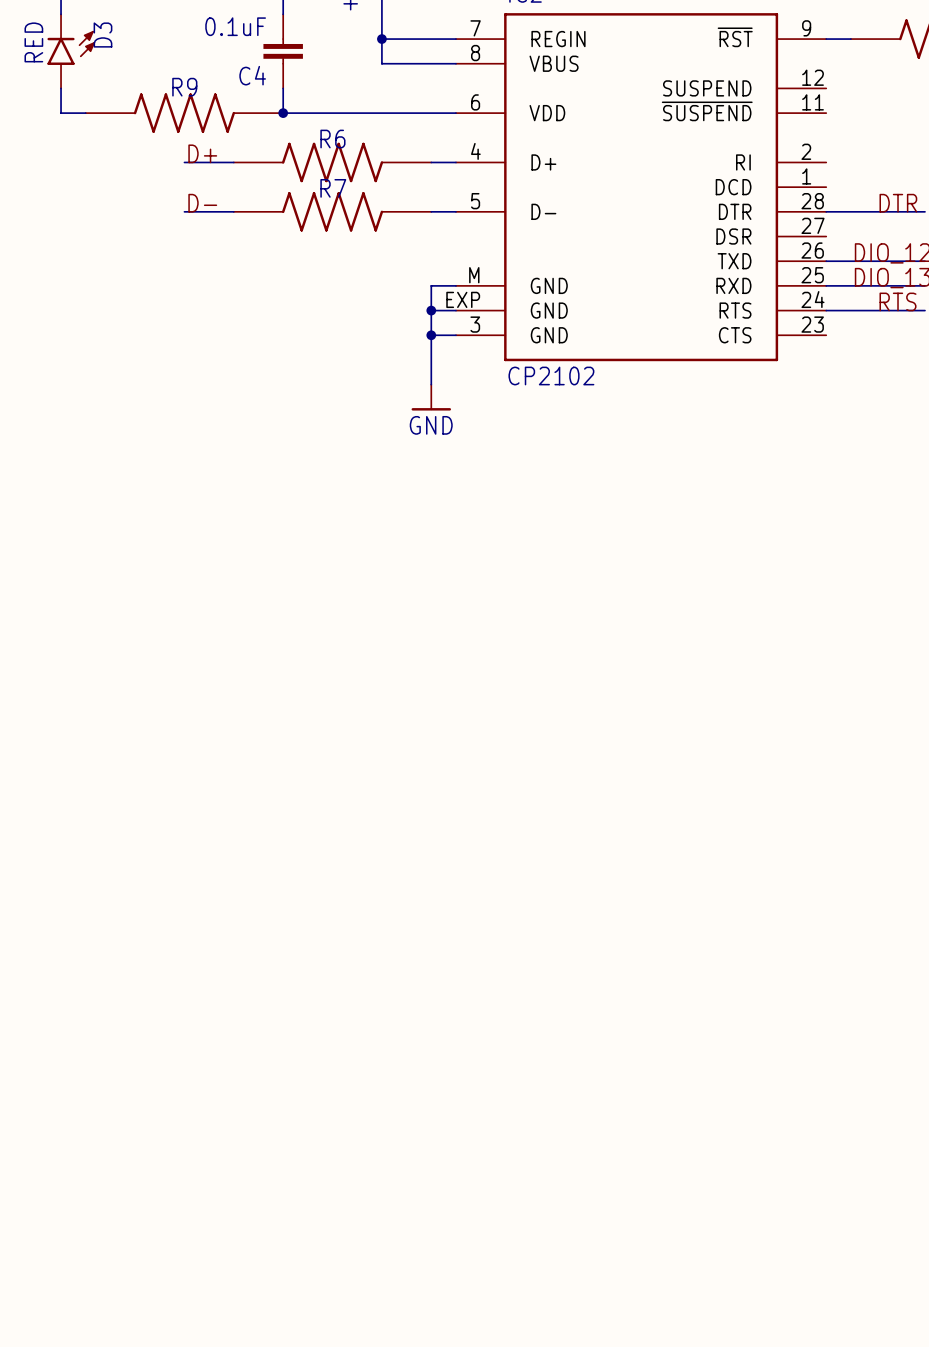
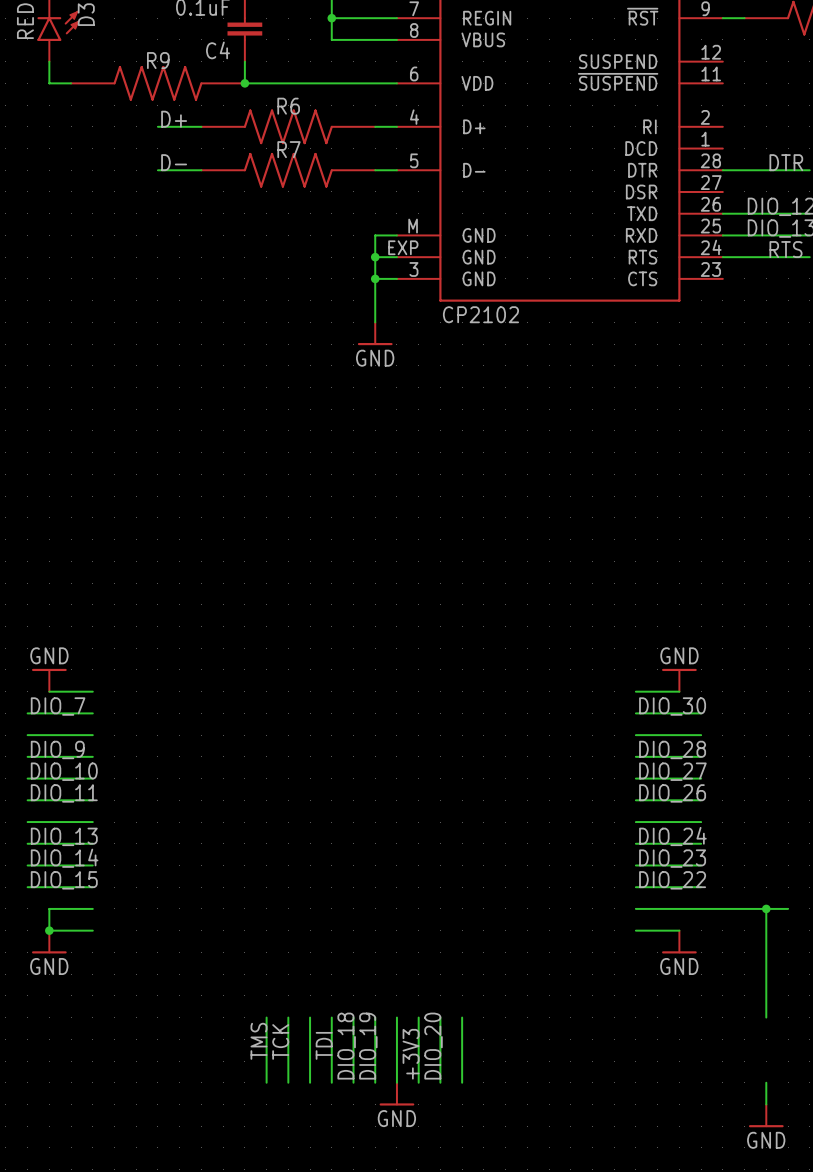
power symbol: none -> GND (49, 680)
power symbol: none -> GND (679, 680)
wire: none -> (49, 691) (92, 691)
wire: none -> (635, 691) (679, 691)
label: none -> DIO_7 (58, 706)
label: none -> DIO_30 (672, 706)
wire: none -> (27, 713) (92, 713)
wire: none -> (635, 713) (701, 713)
wire: none -> (27, 735) (92, 735)
wire: none -> (635, 735) (701, 735)
label: none -> DIO_9 (57, 749)
label: none -> DIO_28 (672, 749)
wire: none -> (27, 756) (92, 756)
wire: none -> (635, 756) (701, 756)
label: none -> DIO_10 (64, 771)
label: none -> DIO_27 (672, 771)
wire: none -> (27, 778) (92, 778)
wire: none -> (635, 778) (701, 778)
label: none -> DIO_11 (64, 793)
label: none -> DIO_26 (672, 793)
wire: none -> (27, 800) (92, 800)
wire: none -> (635, 800) (701, 800)
wire: none -> (27, 822) (92, 822)
wire: none -> (635, 822) (701, 822)
label: none -> DIO_24 (672, 836)
label: none -> DIO_13 (64, 836)
wire: none -> (27, 843) (92, 843)
wire: none -> (635, 843) (701, 843)
label: none -> DIO_14 (64, 858)
label: none -> DIO_23 (672, 858)
wire: none -> (27, 865) (92, 865)
wire: none -> (635, 865) (701, 865)
label: none -> DIO_15 (64, 880)
label: none -> DIO_22 (672, 880)
wire: none -> (27, 887) (92, 887)
wire: none -> (635, 887) (701, 887)
wire: none -> (92, 908) (49, 908) (49, 930) (92, 930)
wire: none -> (635, 908) (788, 908)
wire: none -> (766, 908) (766, 1017)
junction: none -> (766, 908)
junction: none -> (49, 930)
wire: none -> (635, 930) (679, 930)
power symbol: none -> GND (49, 942)
power symbol: none -> GND (679, 942)
wire: none -> (266, 1017) (266, 1082)
wire: none -> (288, 1017) (288, 1082)
wire: none -> (310, 1017) (310, 1082)
wire: none -> (331, 1017) (331, 1082)
wire: none -> (353, 1017) (353, 1082)
wire: none -> (375, 1017) (375, 1082)
wire: none -> (396, 1017) (396, 1082)
wire: none -> (418, 1017) (418, 1082)
wire: none -> (440, 1017) (440, 1082)
wire: none -> (462, 1017) (462, 1082)
label: none -> TMS (259, 1041)
label: none -> TCK (280, 1041)
label: none -> TDI (324, 1045)
label: none -> DIO_18 (346, 1046)
label: none -> DIO_19 (368, 1046)
label: none -> DIO_20 (433, 1046)
label: none -> +3V3 (411, 1054)
wire: none -> (766, 1082) (766, 1104)
power symbol: none -> GND (396, 1094)
power symbol: none -> GND (766, 1115)

